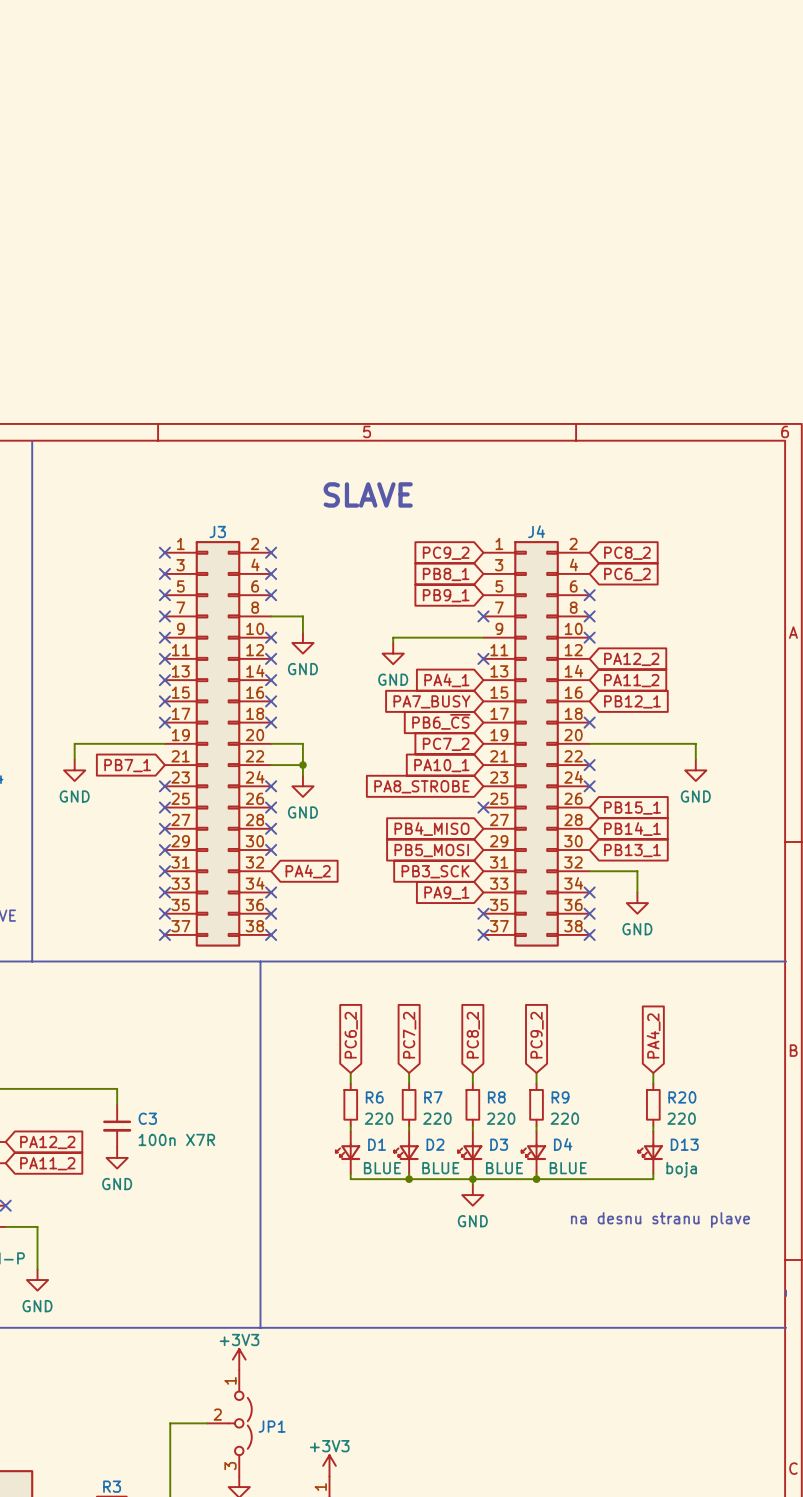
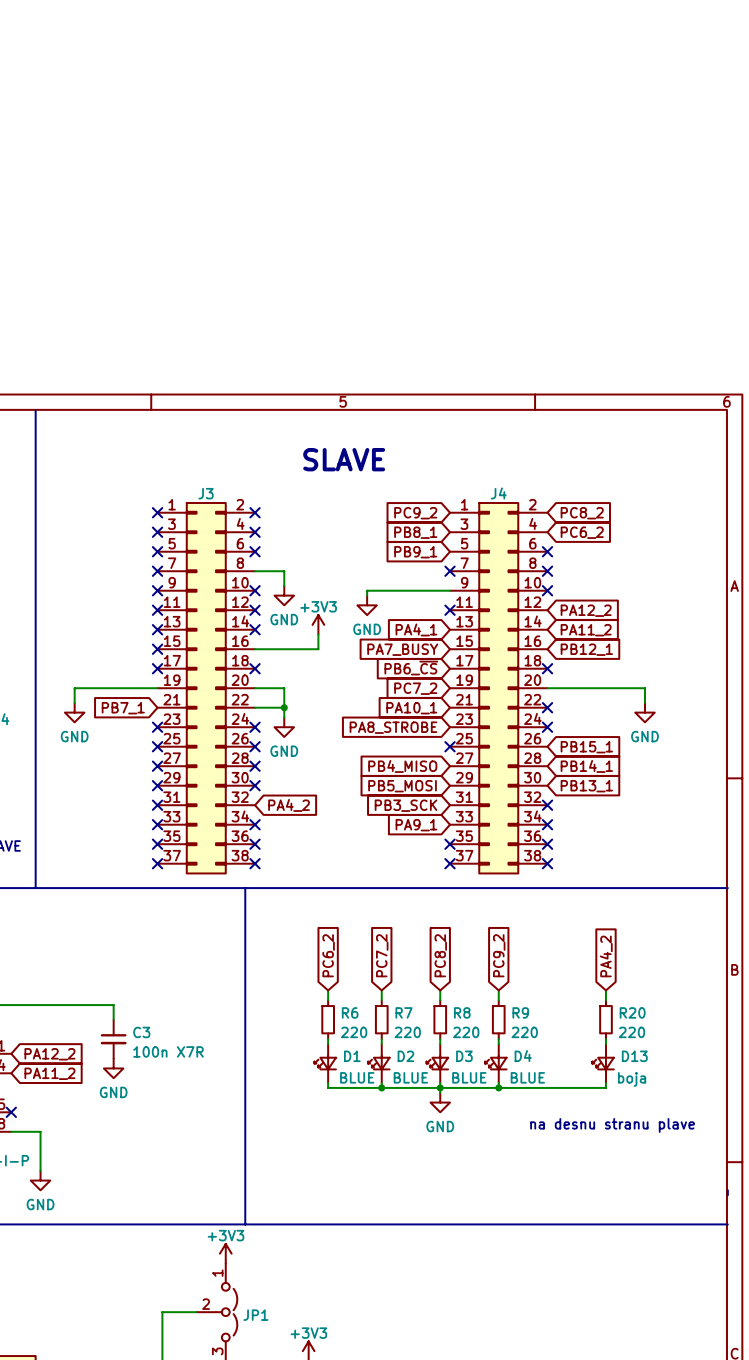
power symbol: none -> +3V3 (318, 624)
wire: none -> (318, 634) (318, 649) (255, 649)
no-connect mark: (271, 701) -> none
wire: (589, 871) (637, 871) (637, 892) -> none
no-connect mark: none -> (547, 805)
power symbol: GND (637, 903) -> none

